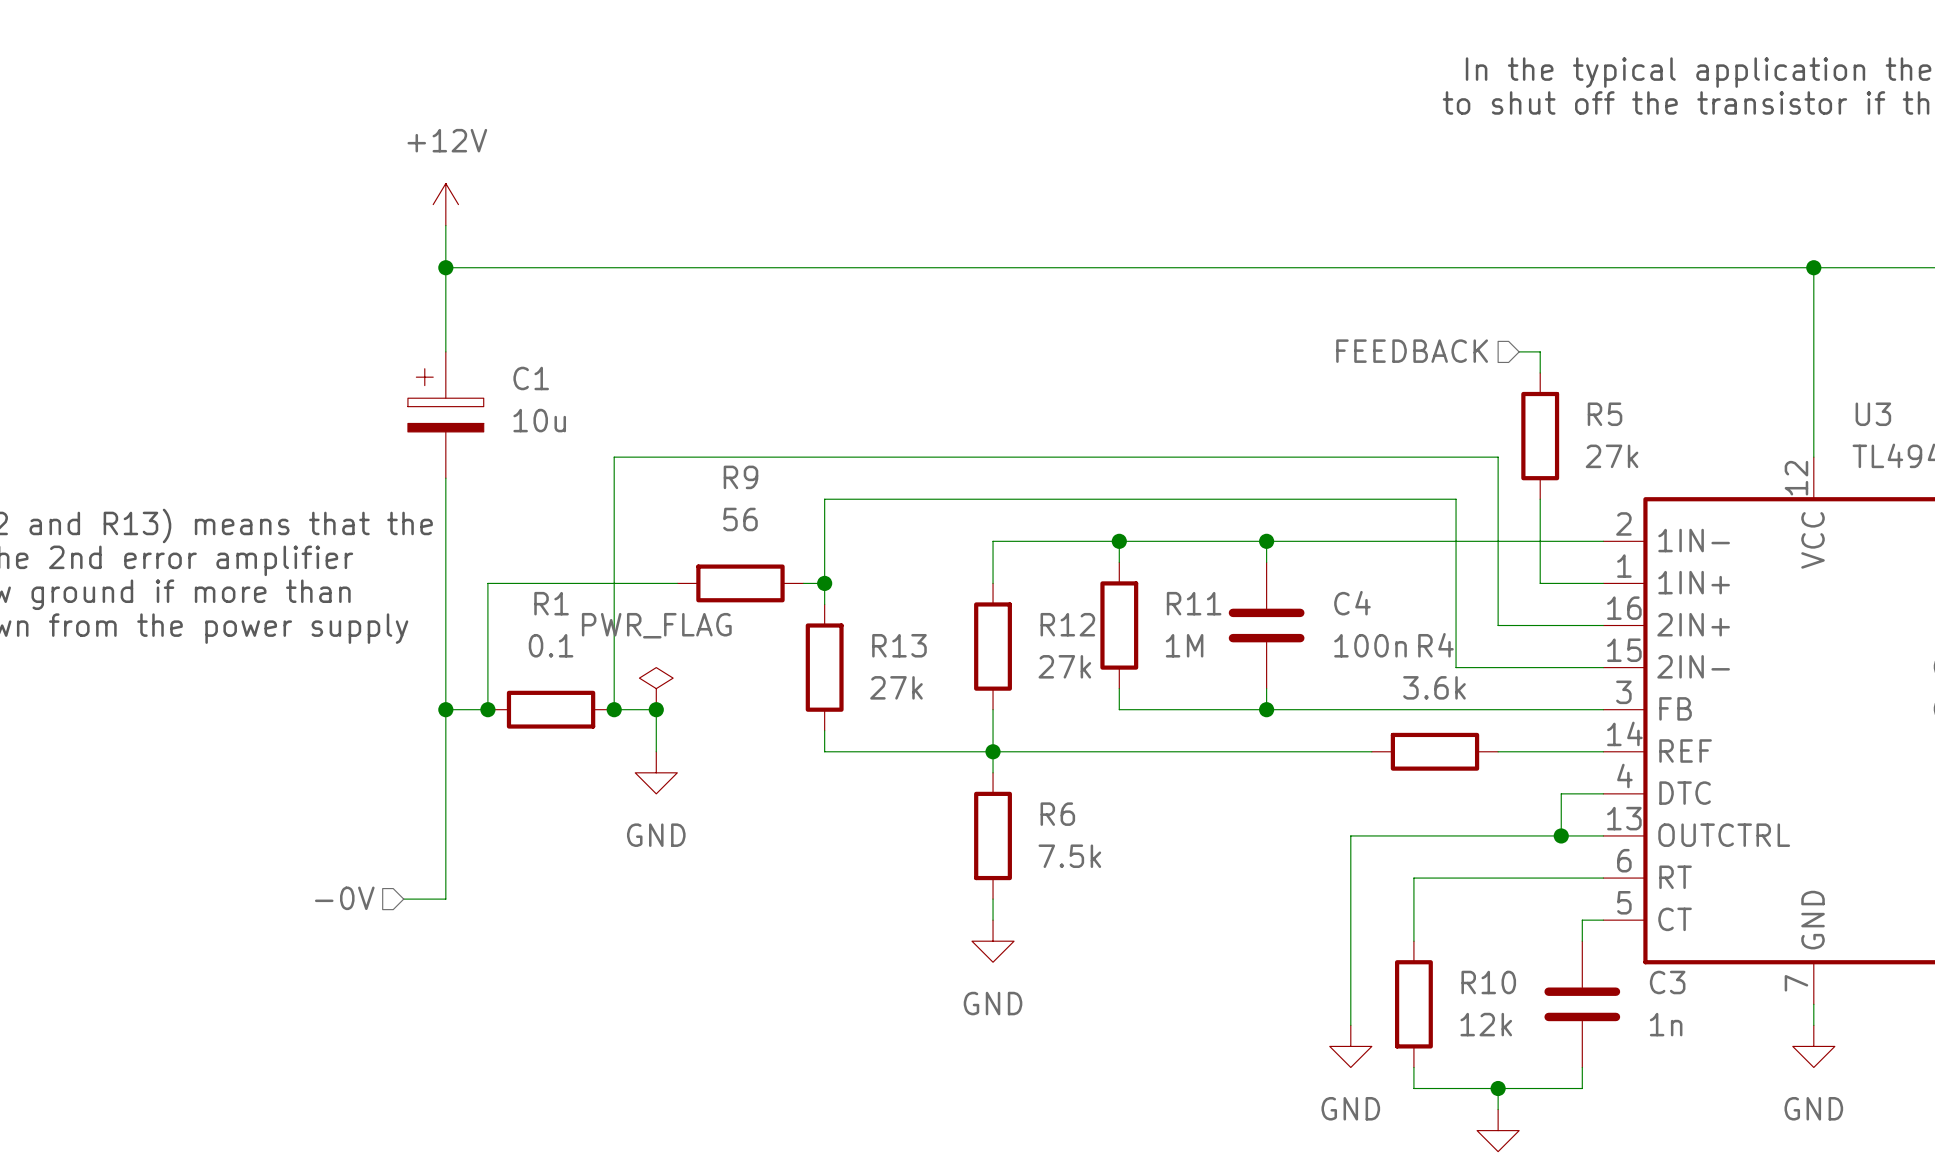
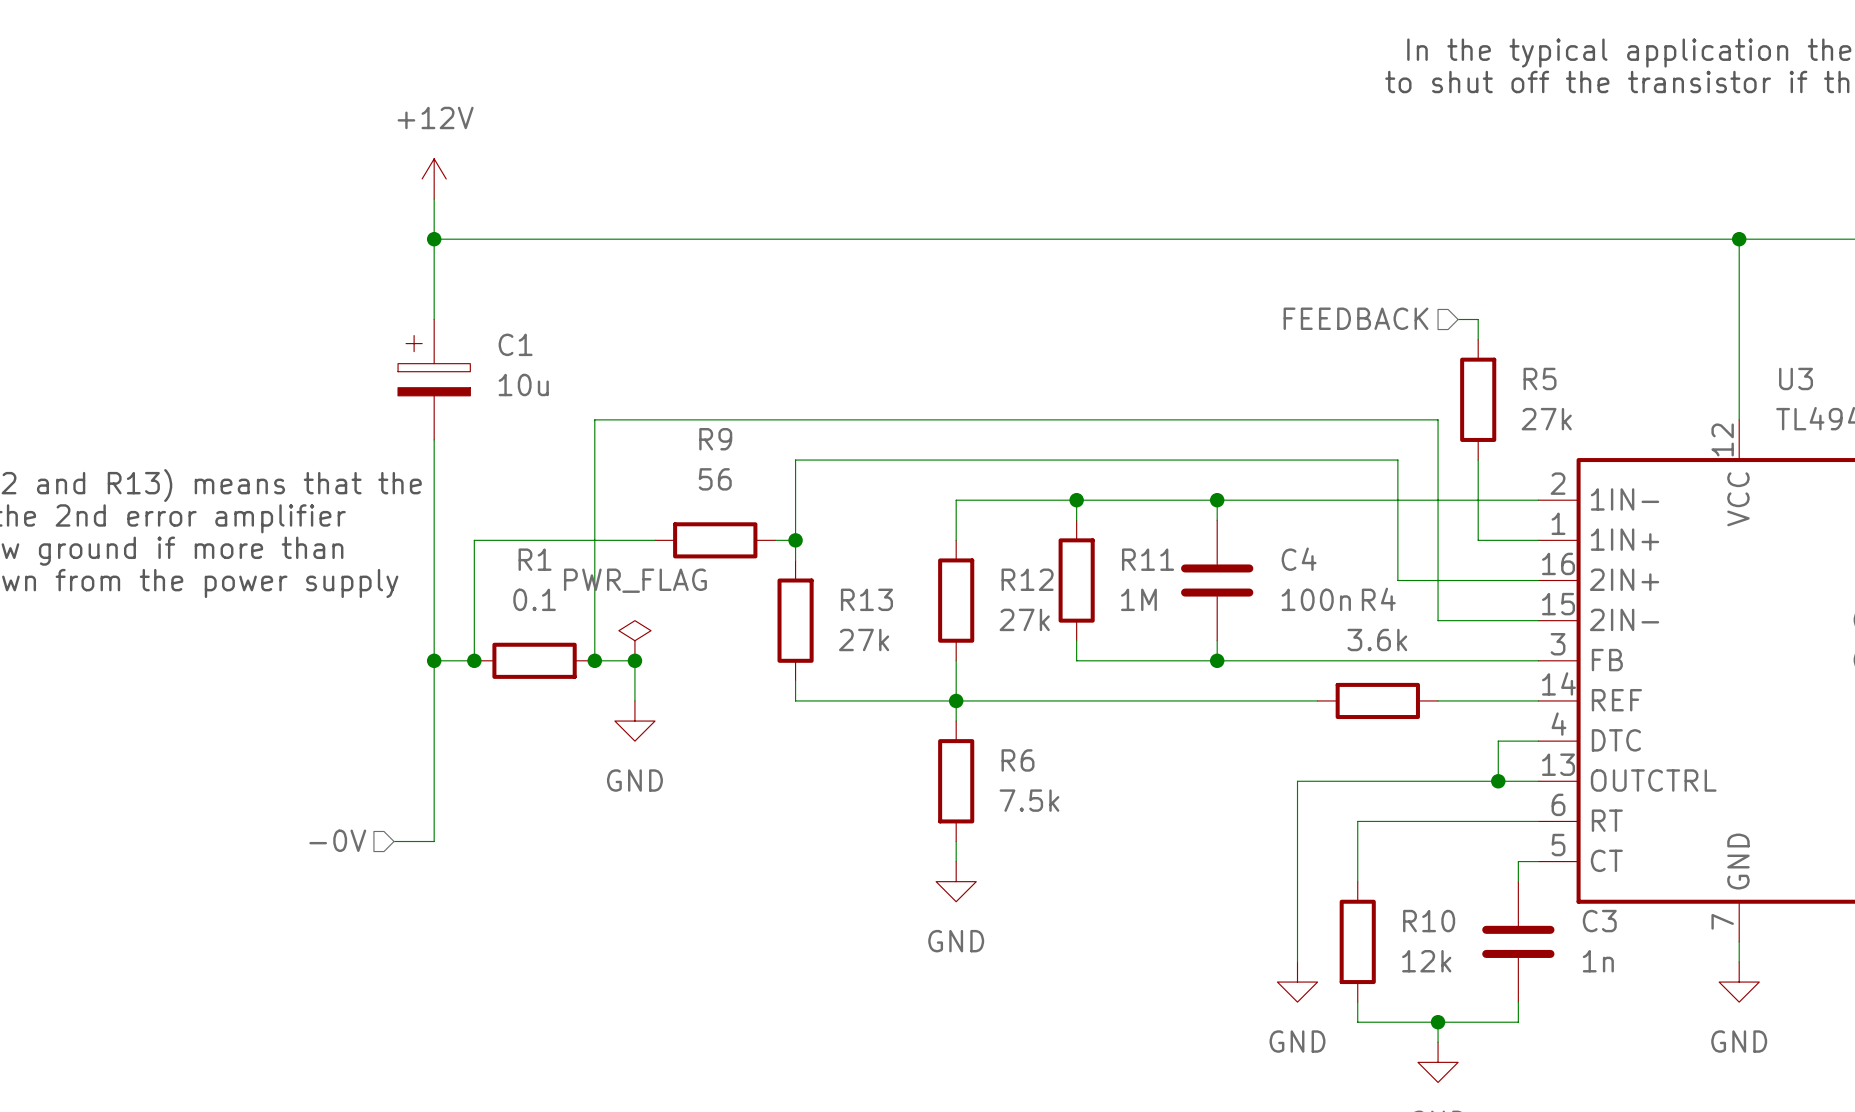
wire: (1456, 625) (1456, 667) (1498, 667) -> (1397, 580) (1438, 580) (1438, 620)

